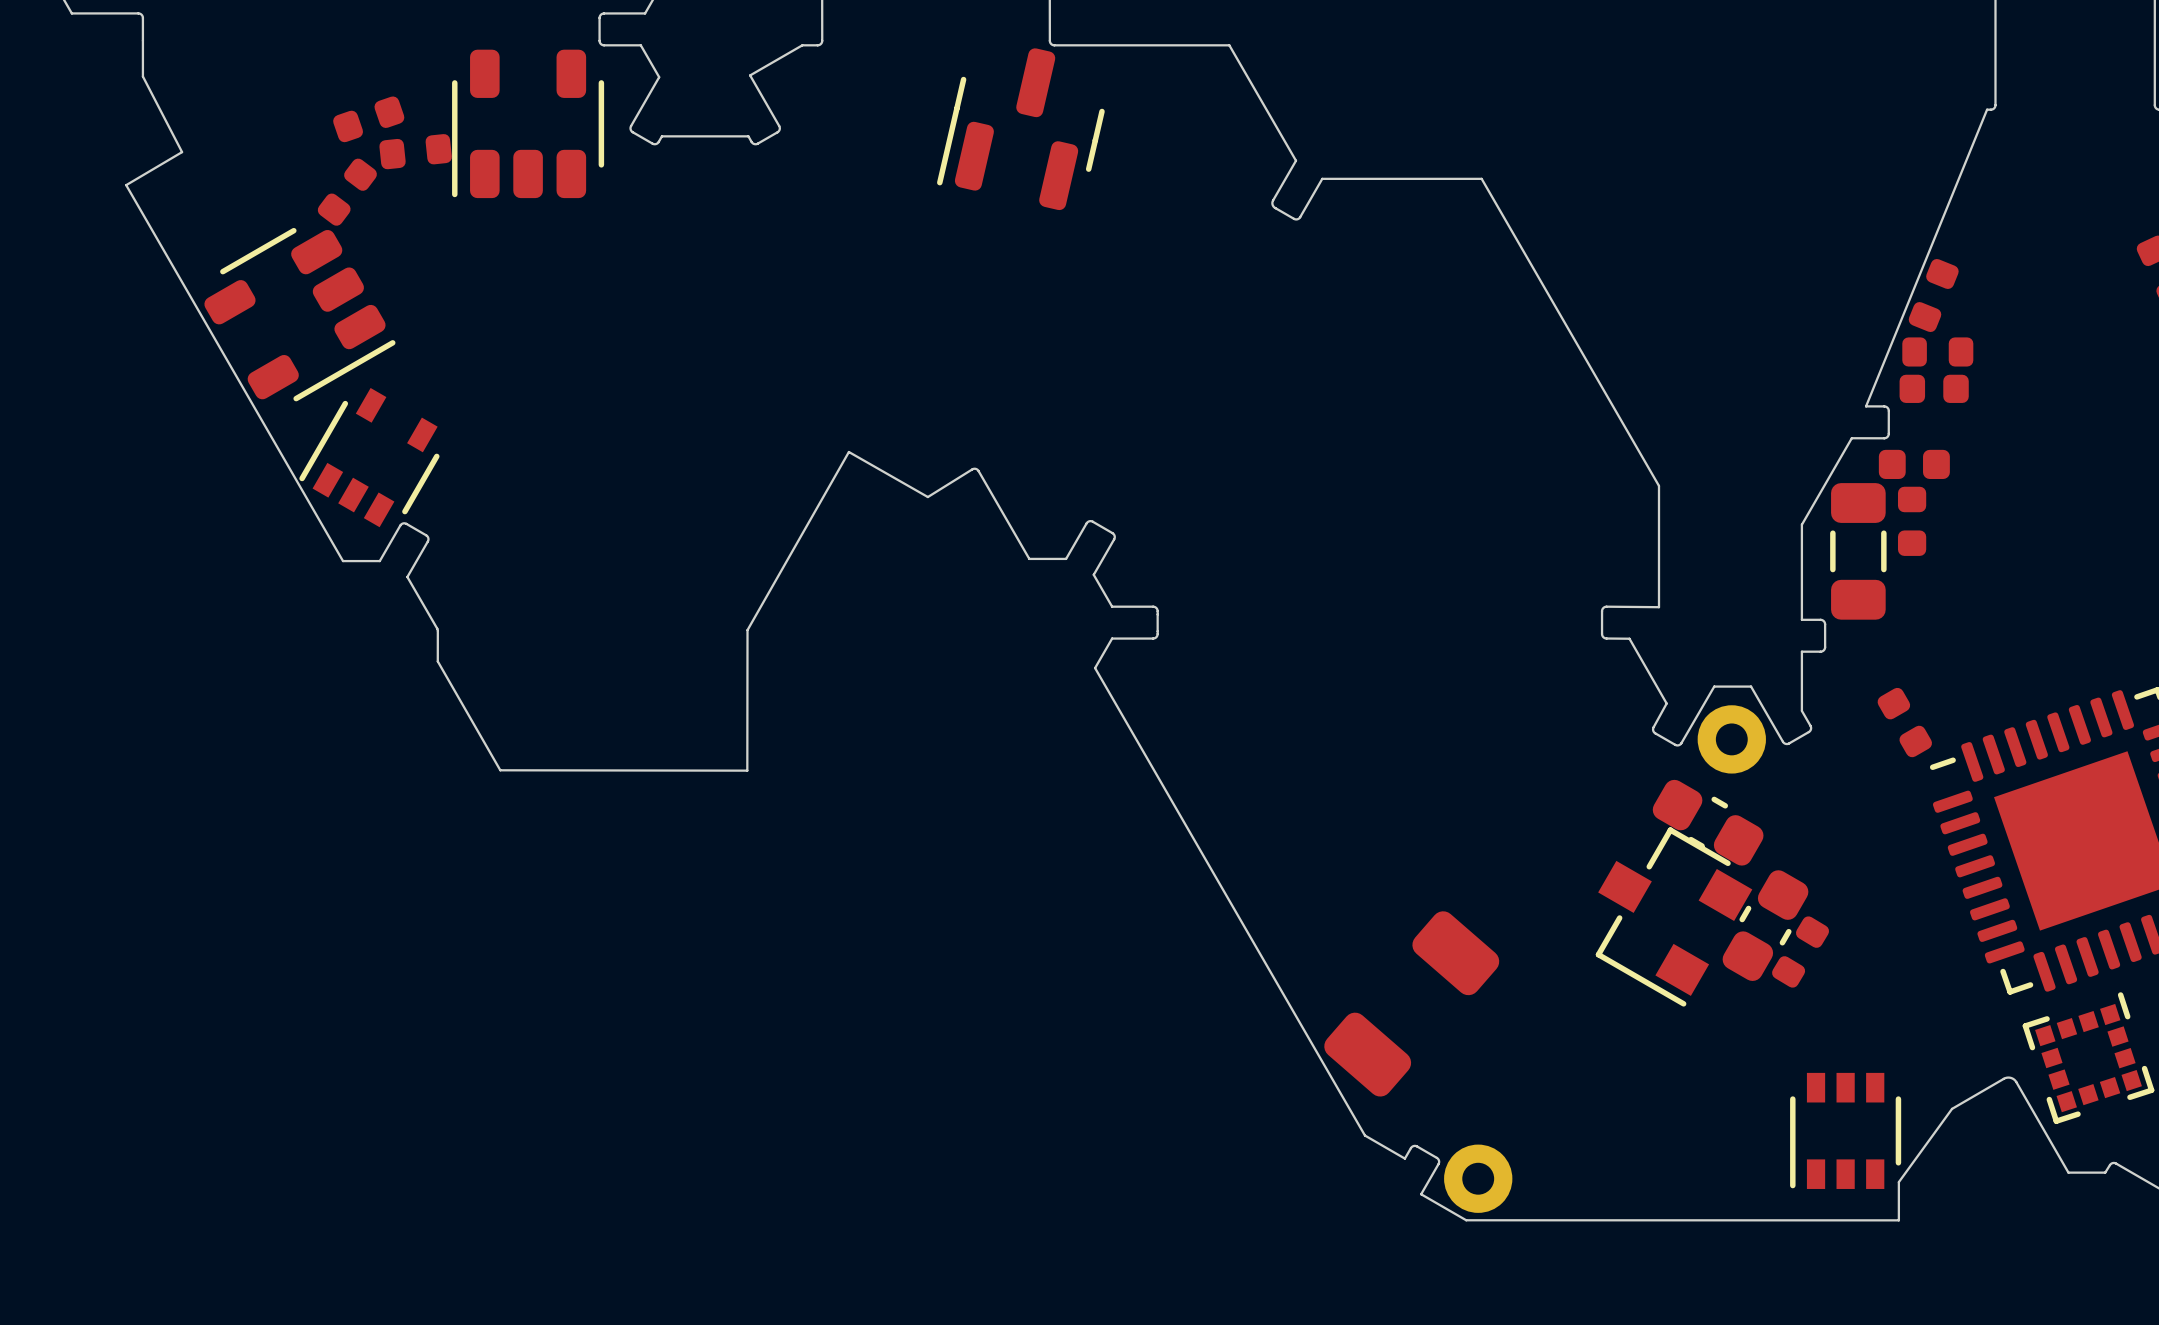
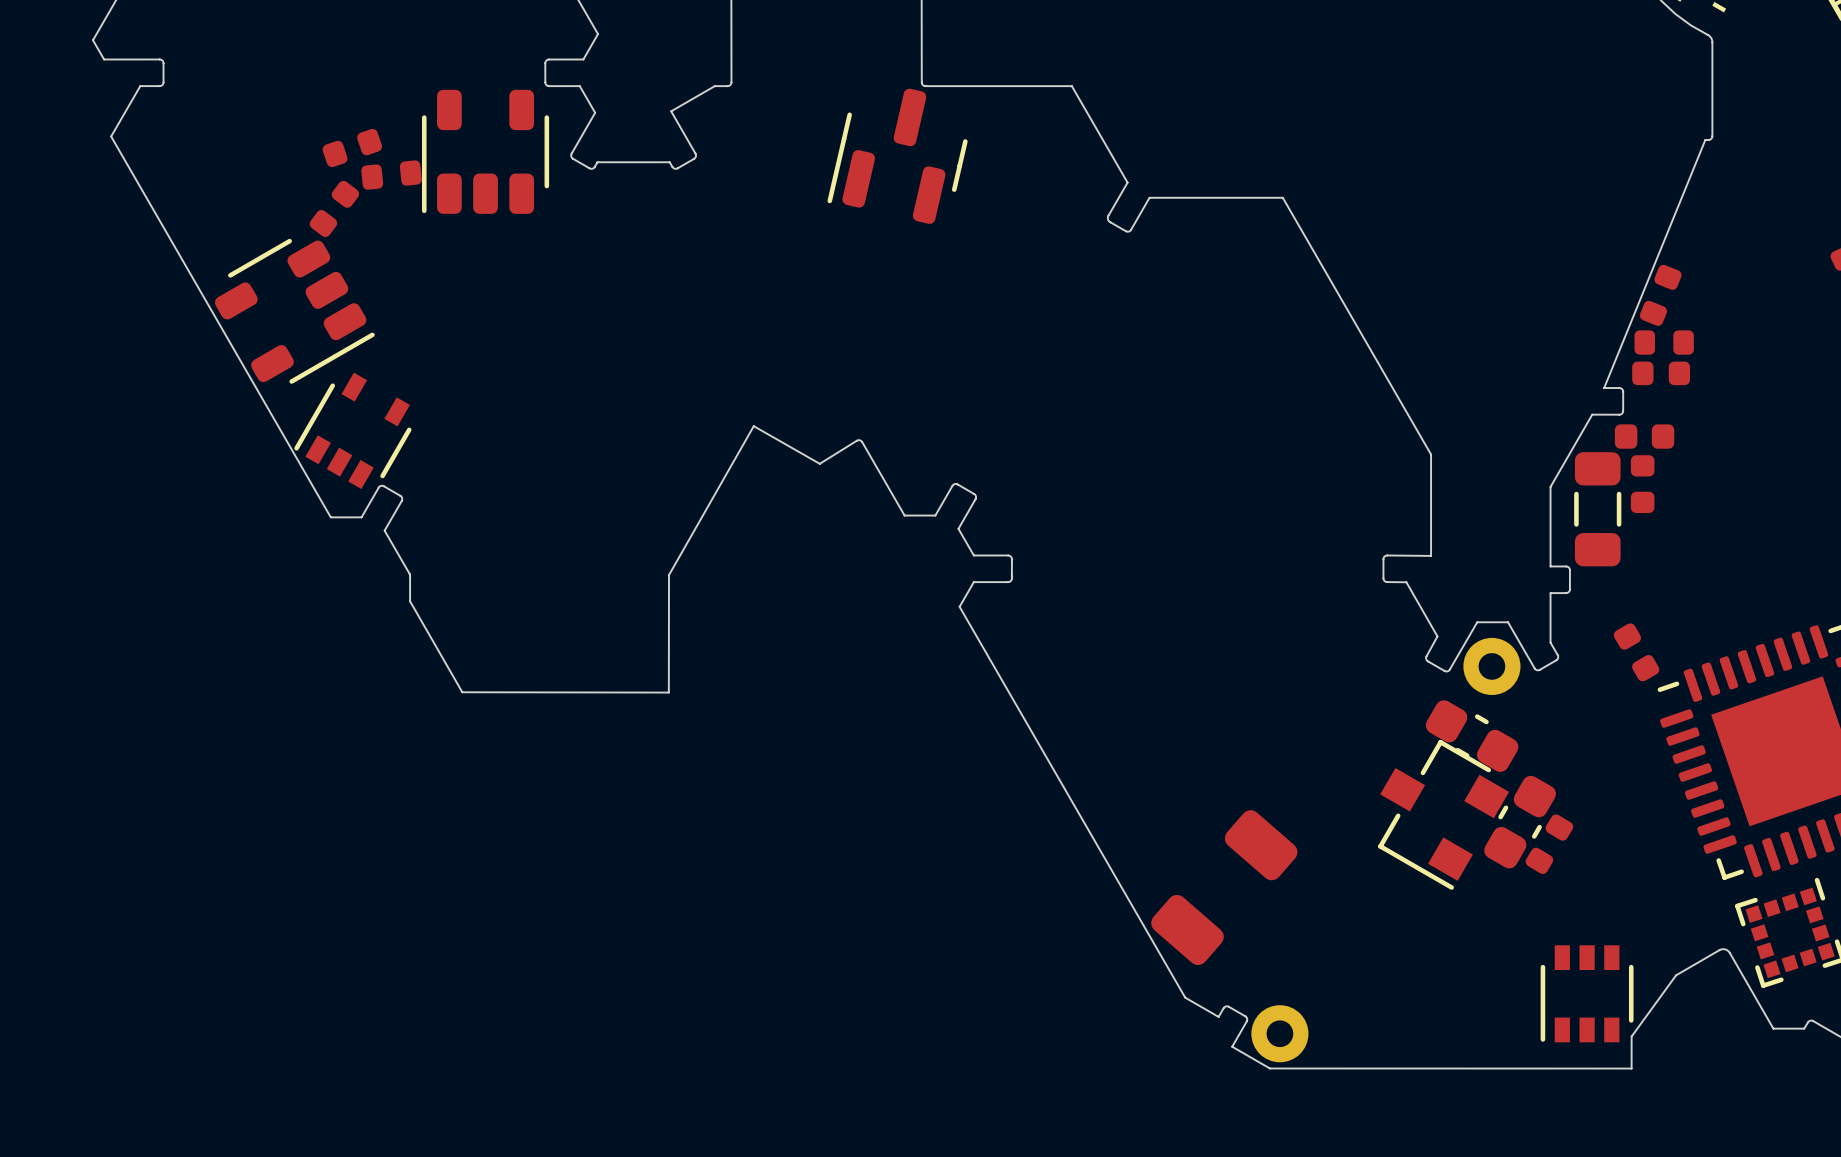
board edge: (142, 40) (142, 76) (182, 152) (126, 185) -> (163, 82) (160, 86) (140, 86) (111, 136) (149, 203)

